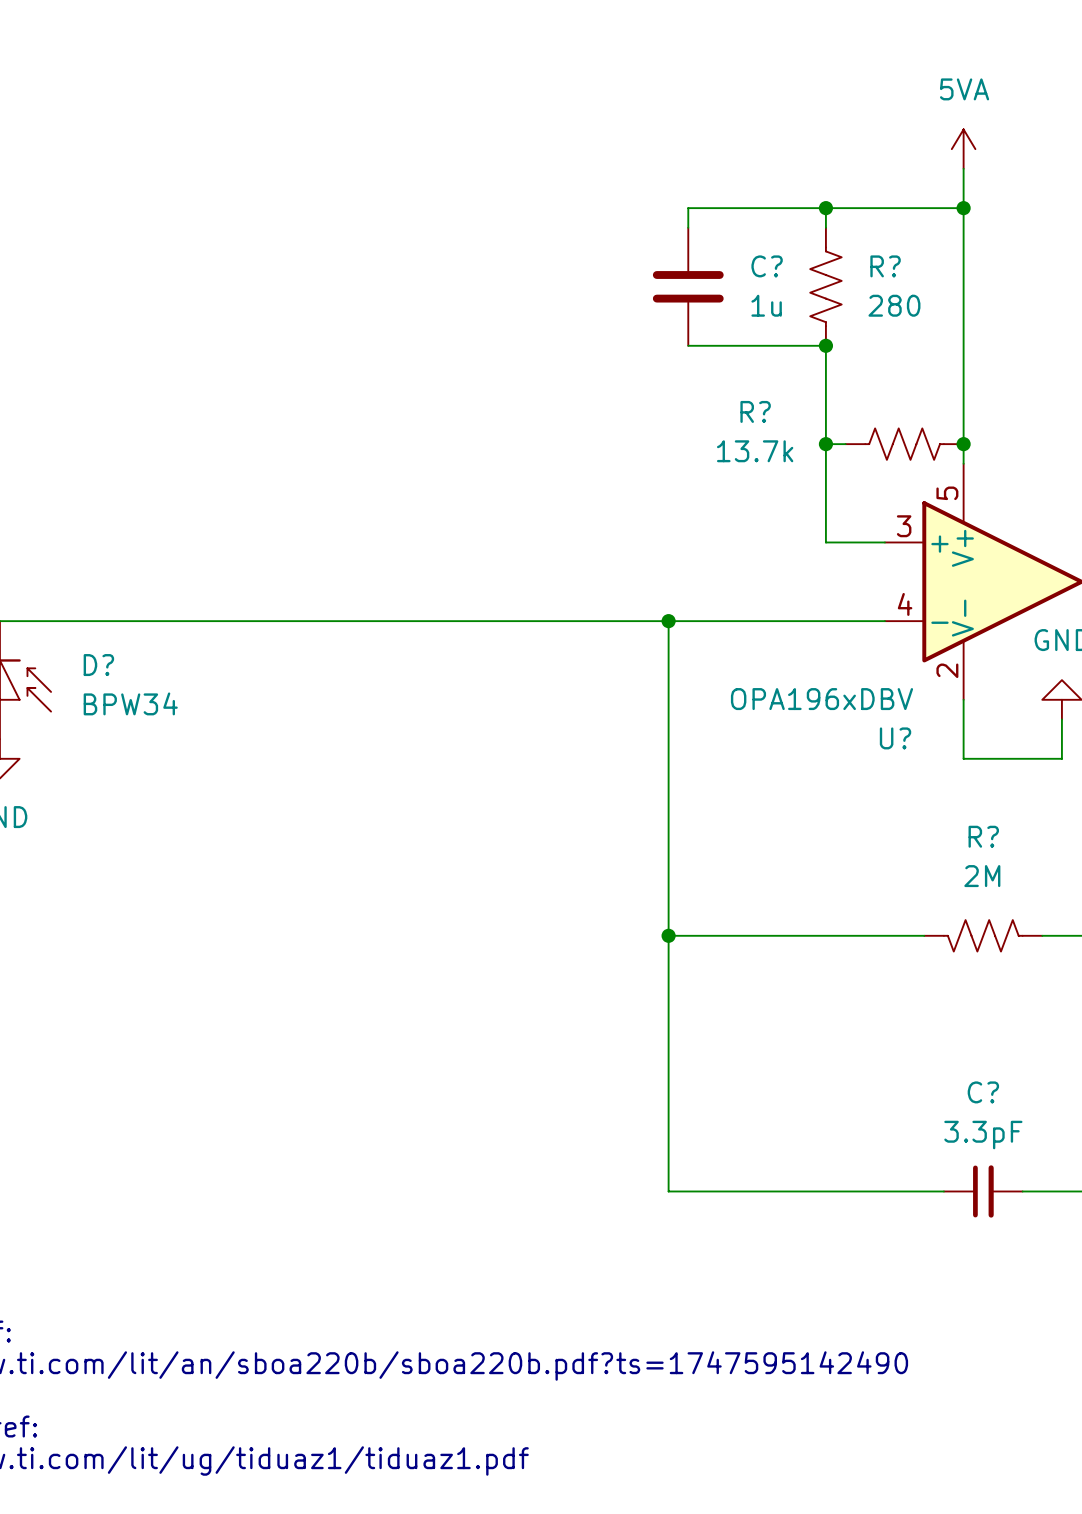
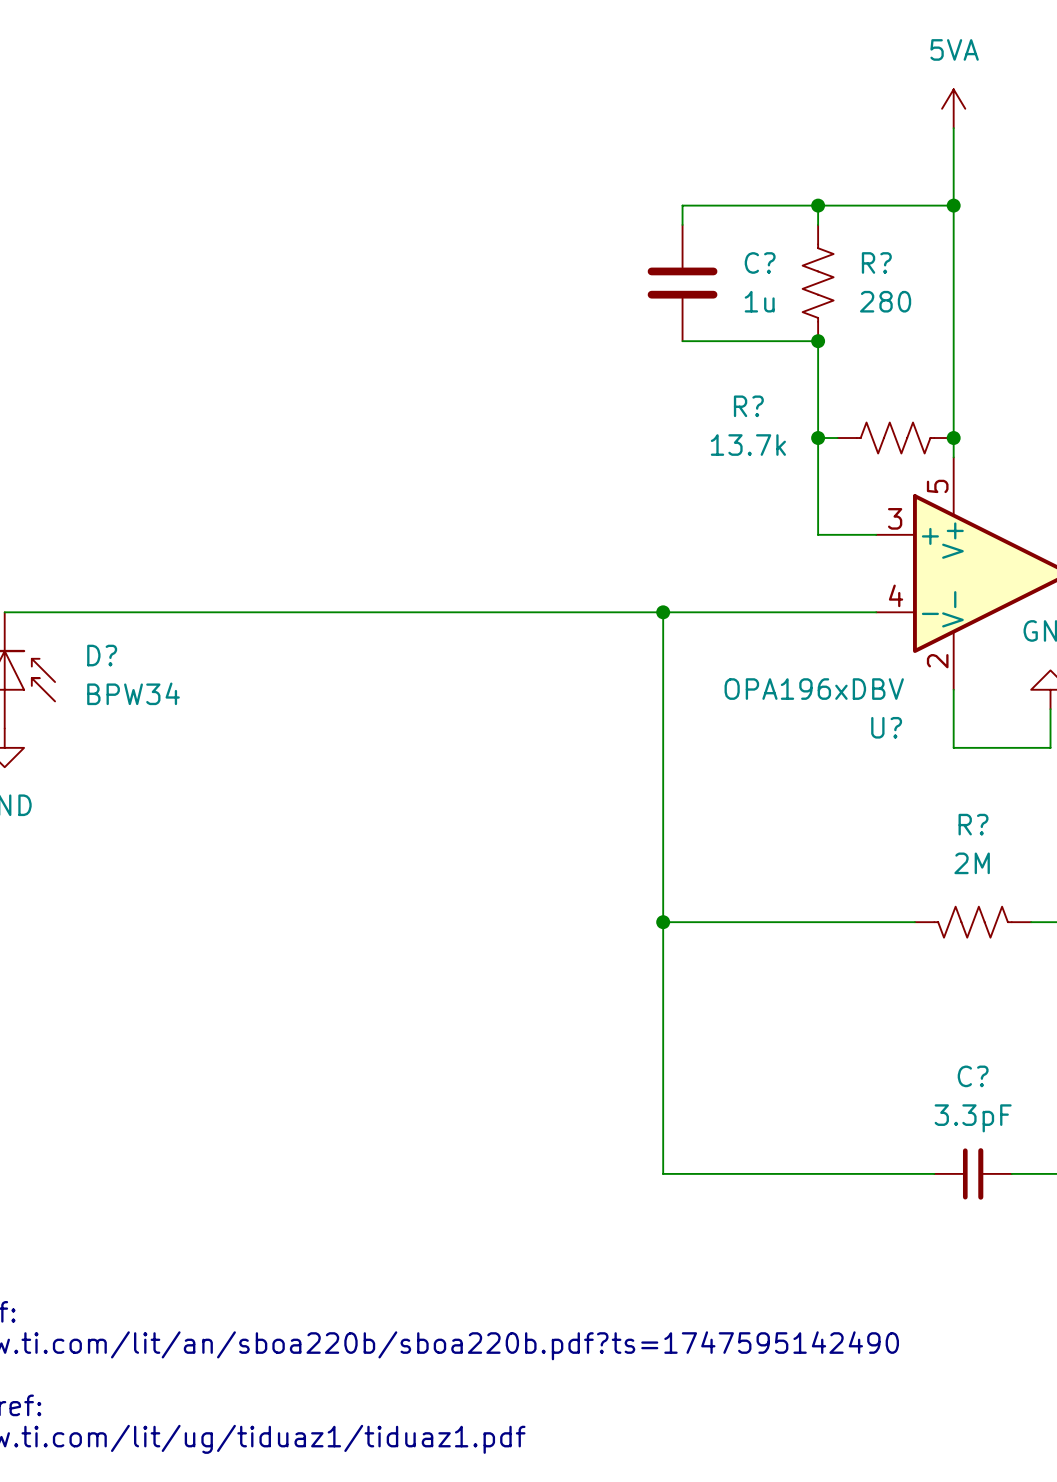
power symbol position: 5VA (963, 149) -> 5VA (953, 108)

